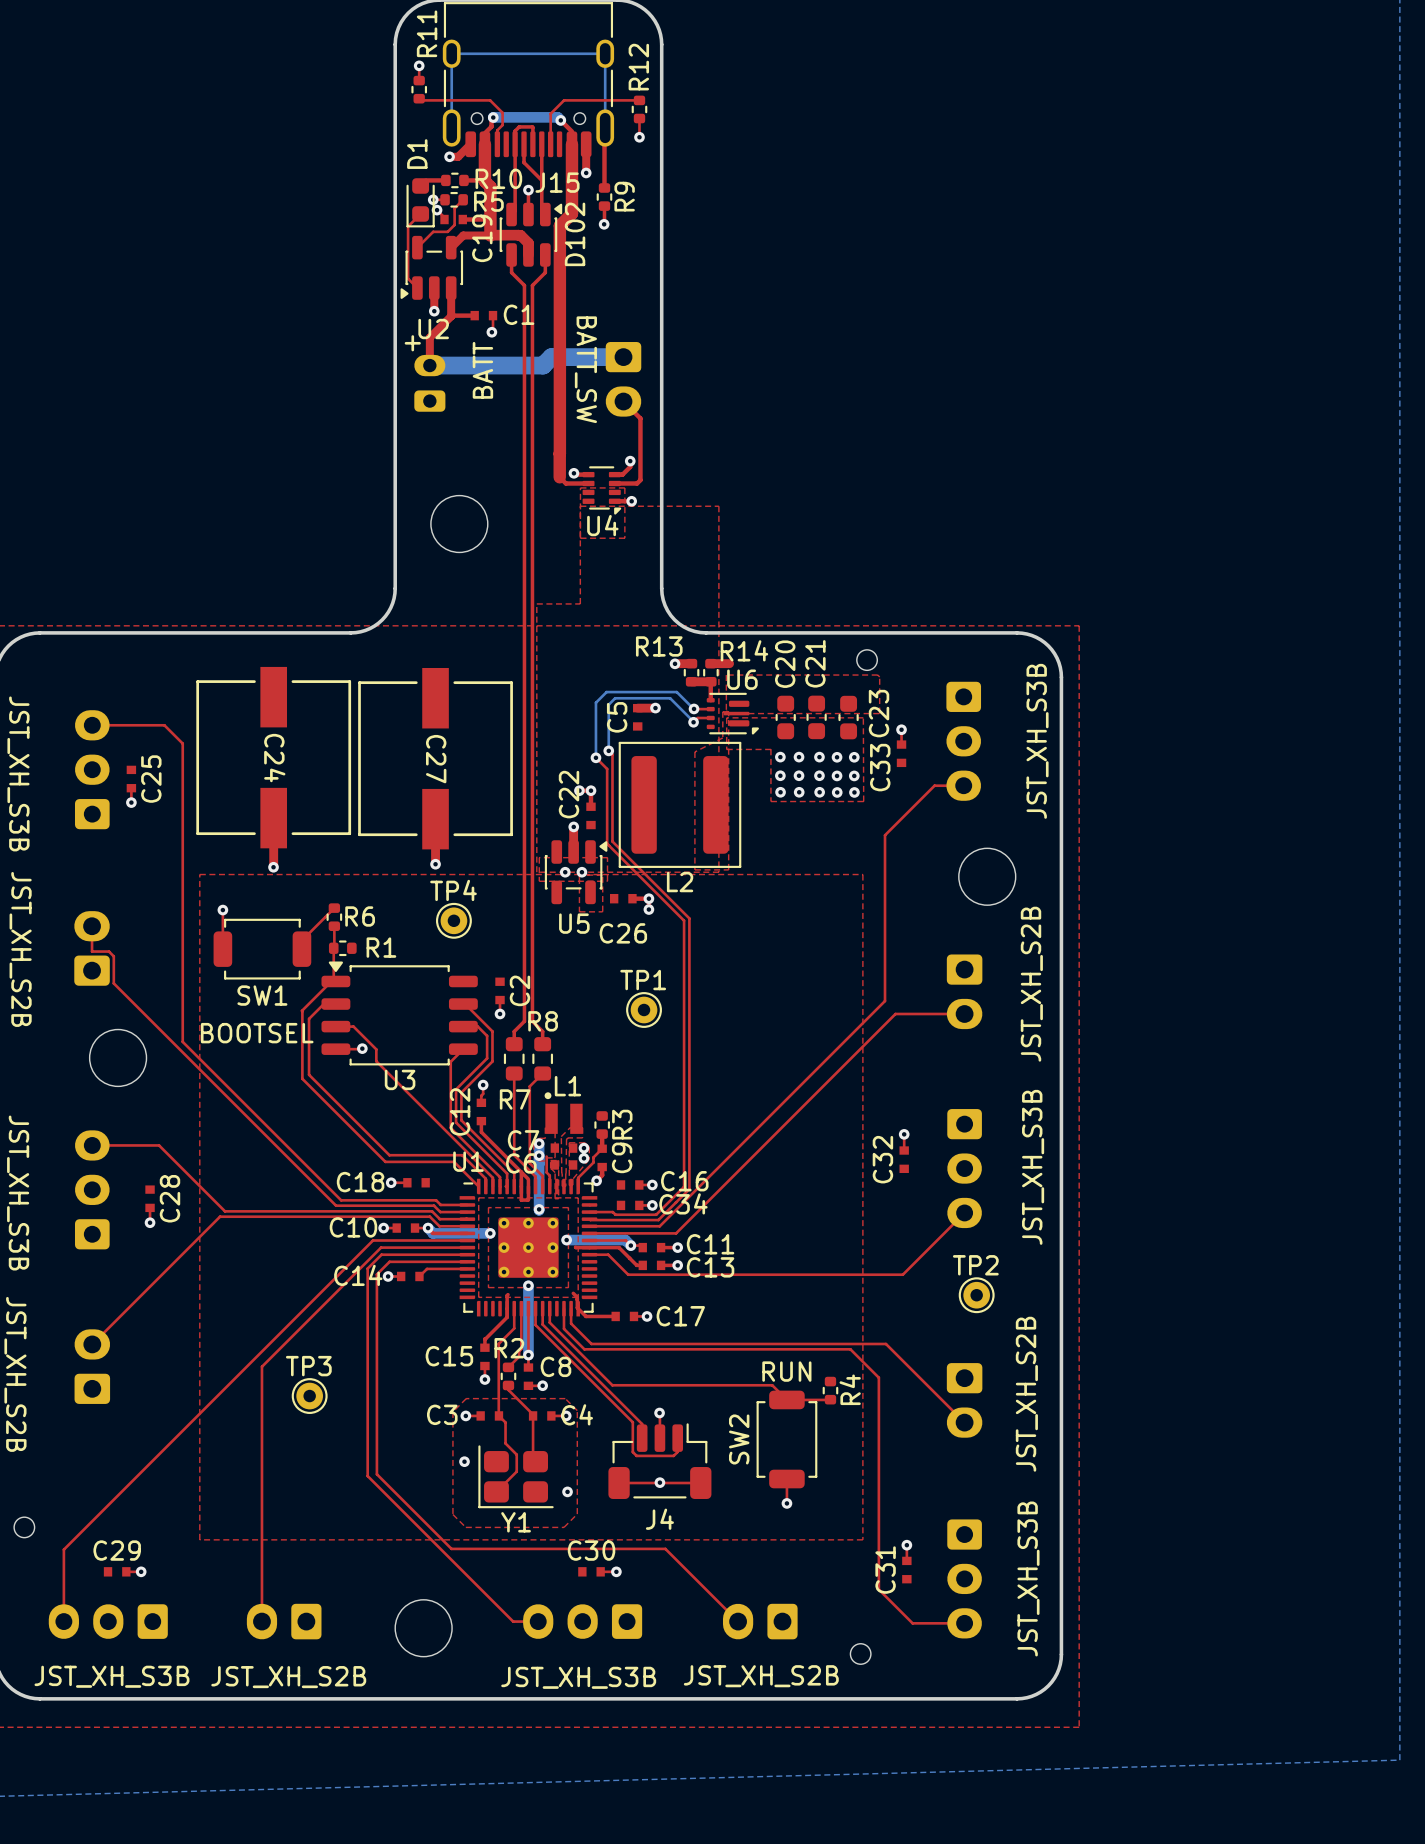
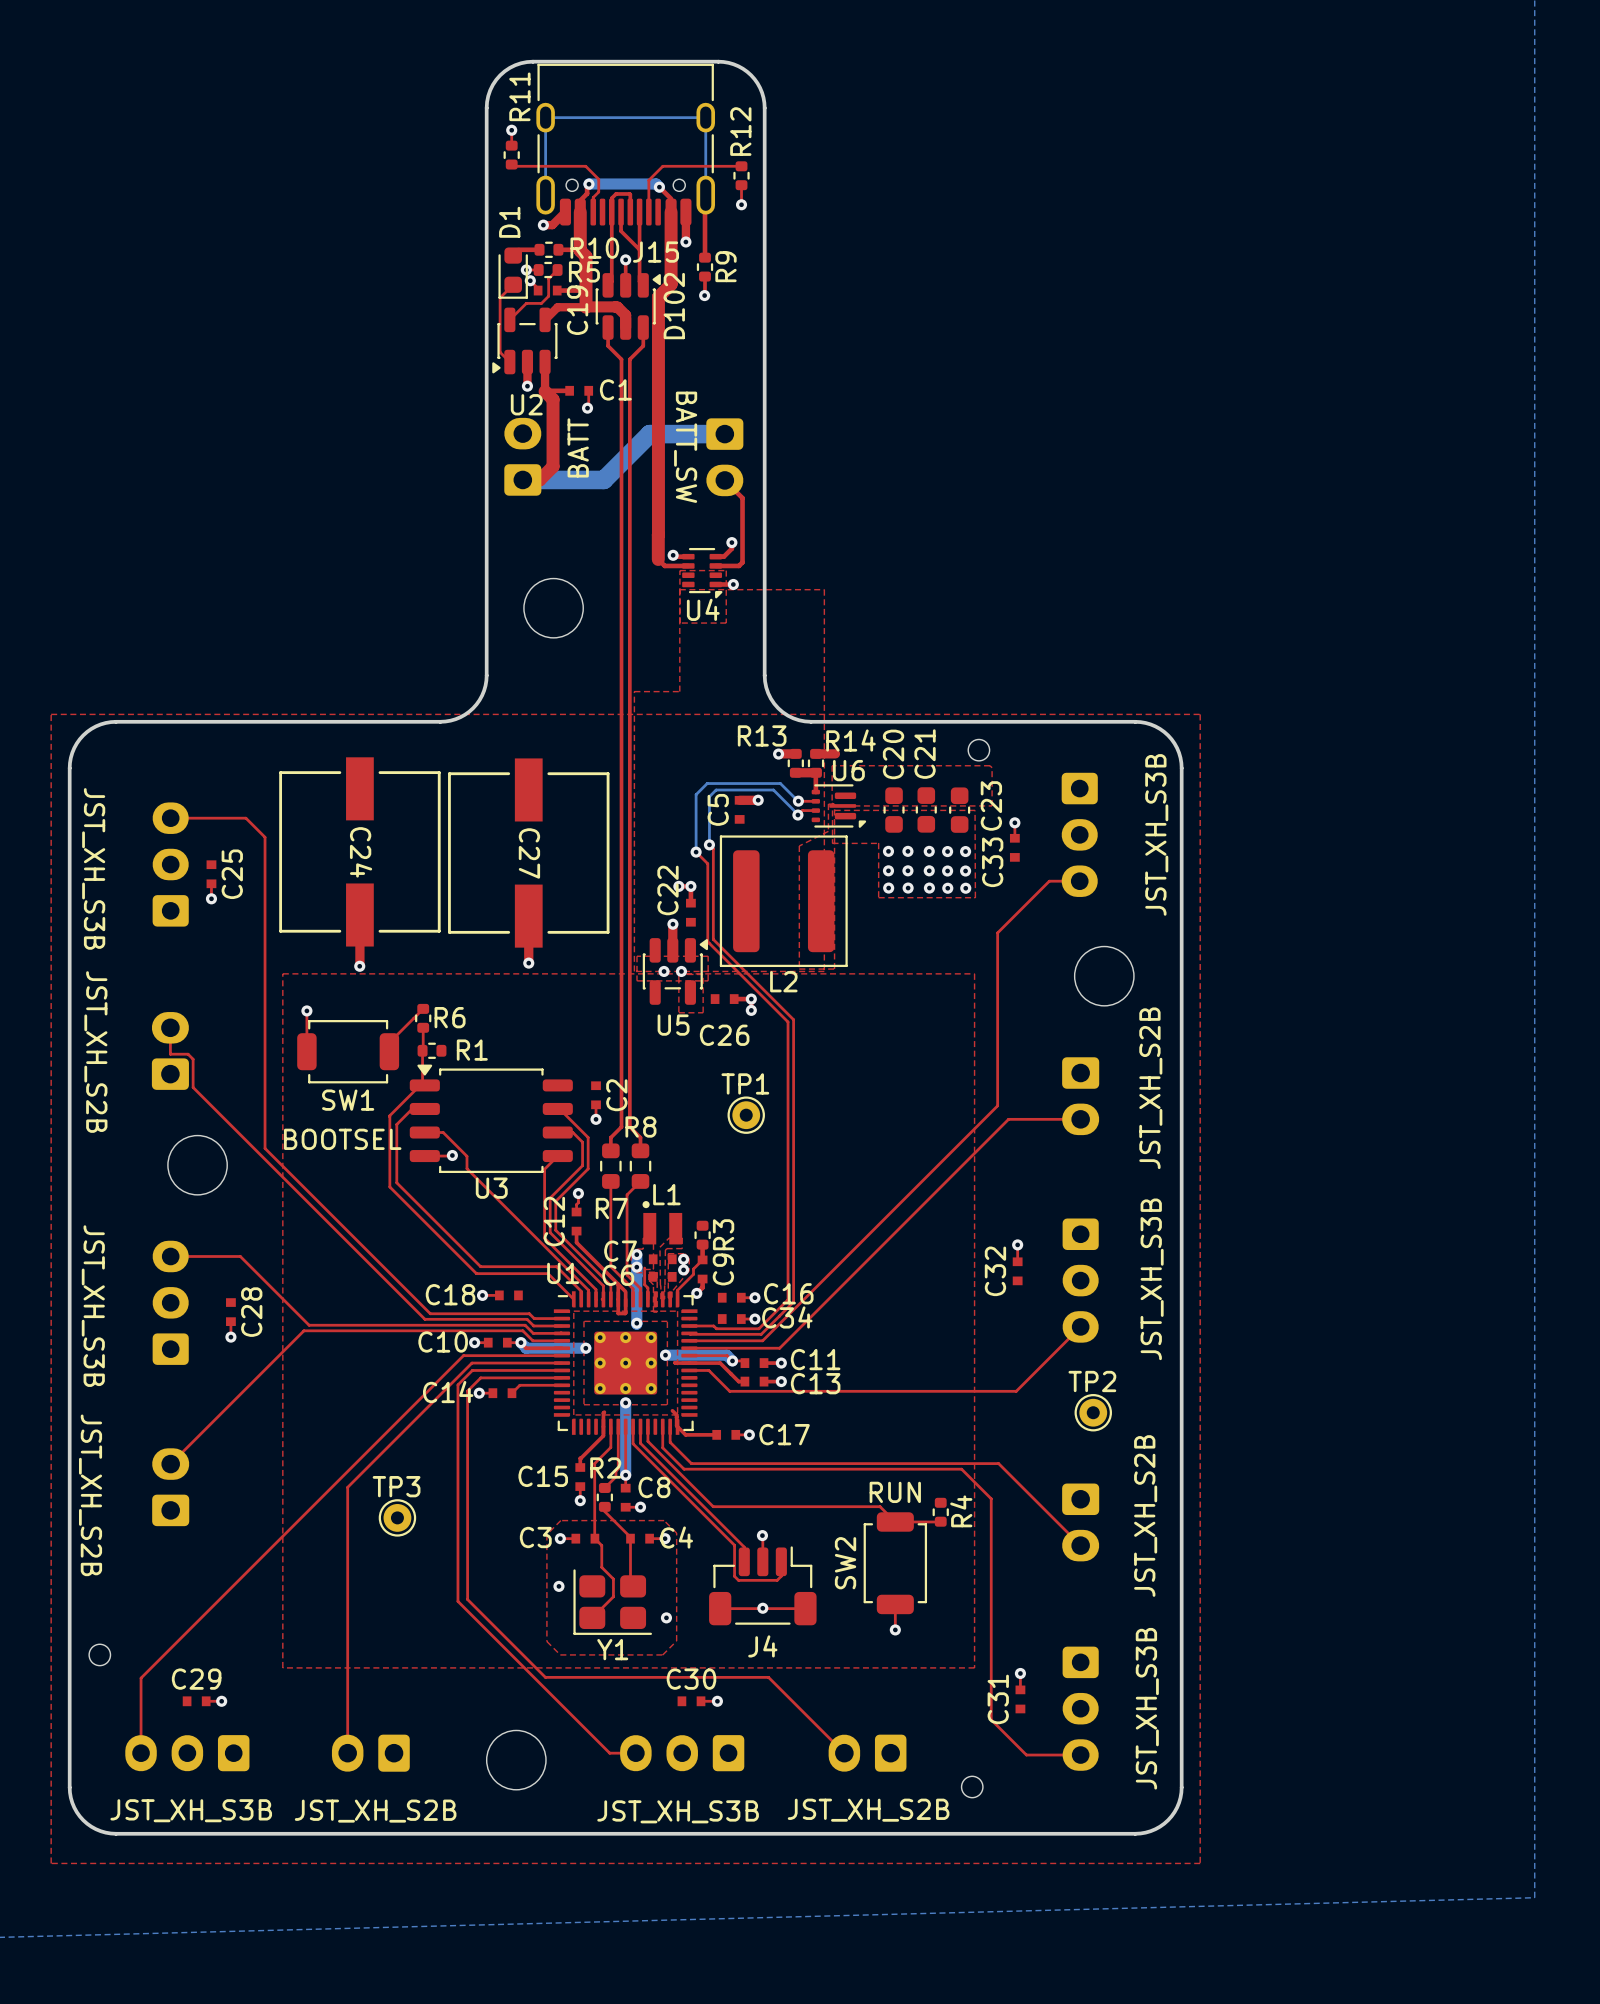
top track: (451, 315) (429, 337) (429, 365) -> none
top track: none -> (545, 391) (553, 399) (553, 466) (539, 479) (522, 479)
text: + (412, 343) -> none
part footprint: [414, 354, 446, 412] -> [504, 417, 542, 496]
bottom track: (429, 365) (543, 365) -> (522, 479) (603, 479) (640, 442)
TP4: (453, 920) -> none

